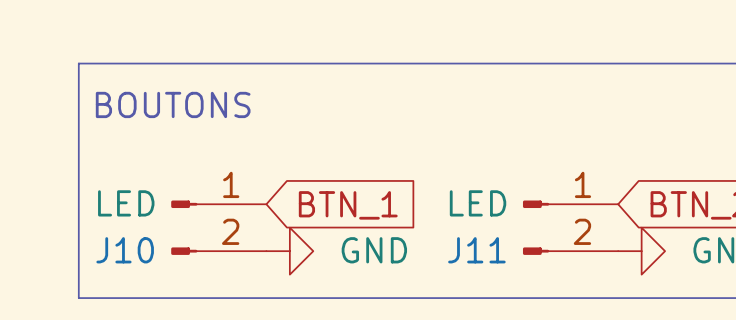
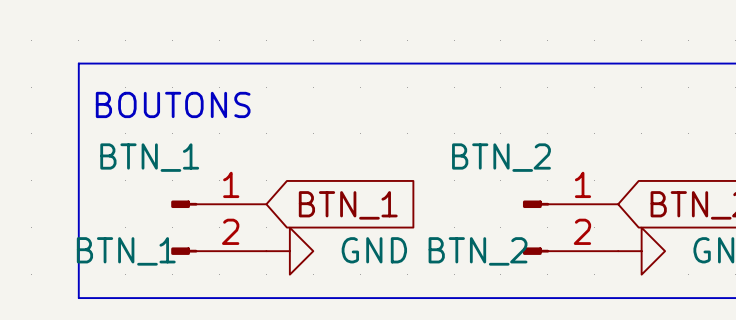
J10 value: LED (126, 203) -> BTN_1 (149, 157)
J11 value: LED (478, 203) -> BTN_2 (501, 157)
J10 name: J10 (125, 250) -> BTN_1 (126, 251)
J11 name: J11 (476, 250) -> BTN_2 (478, 251)

